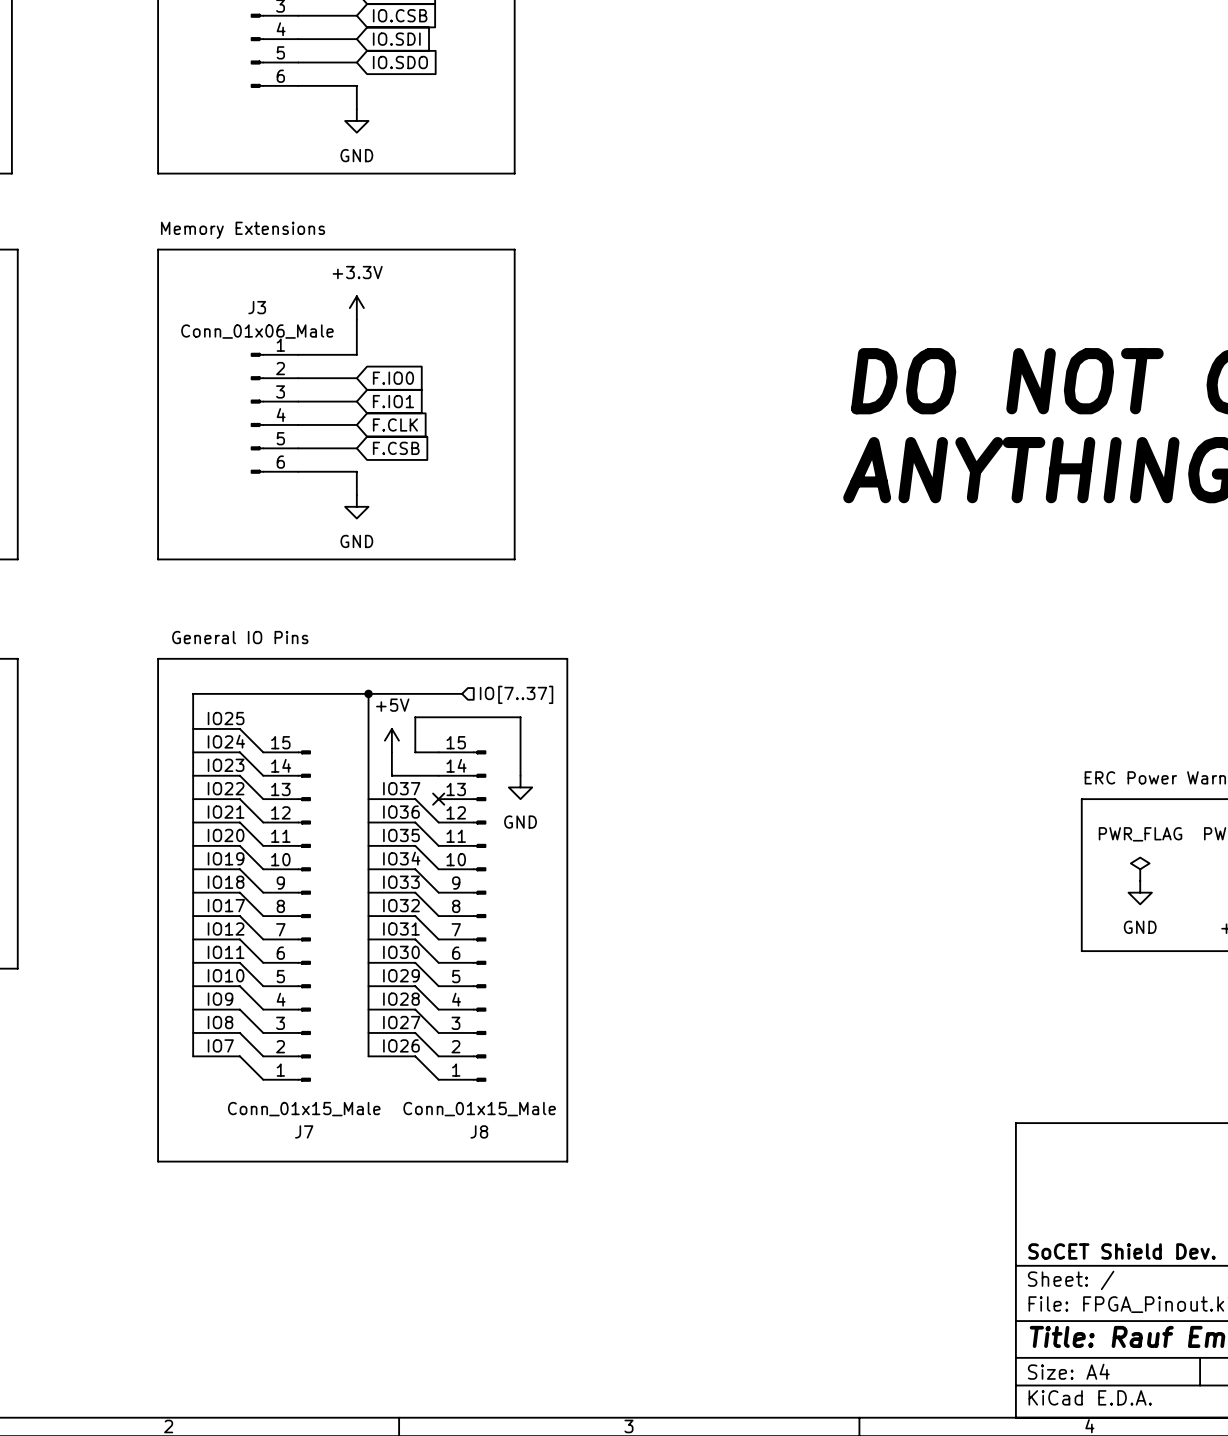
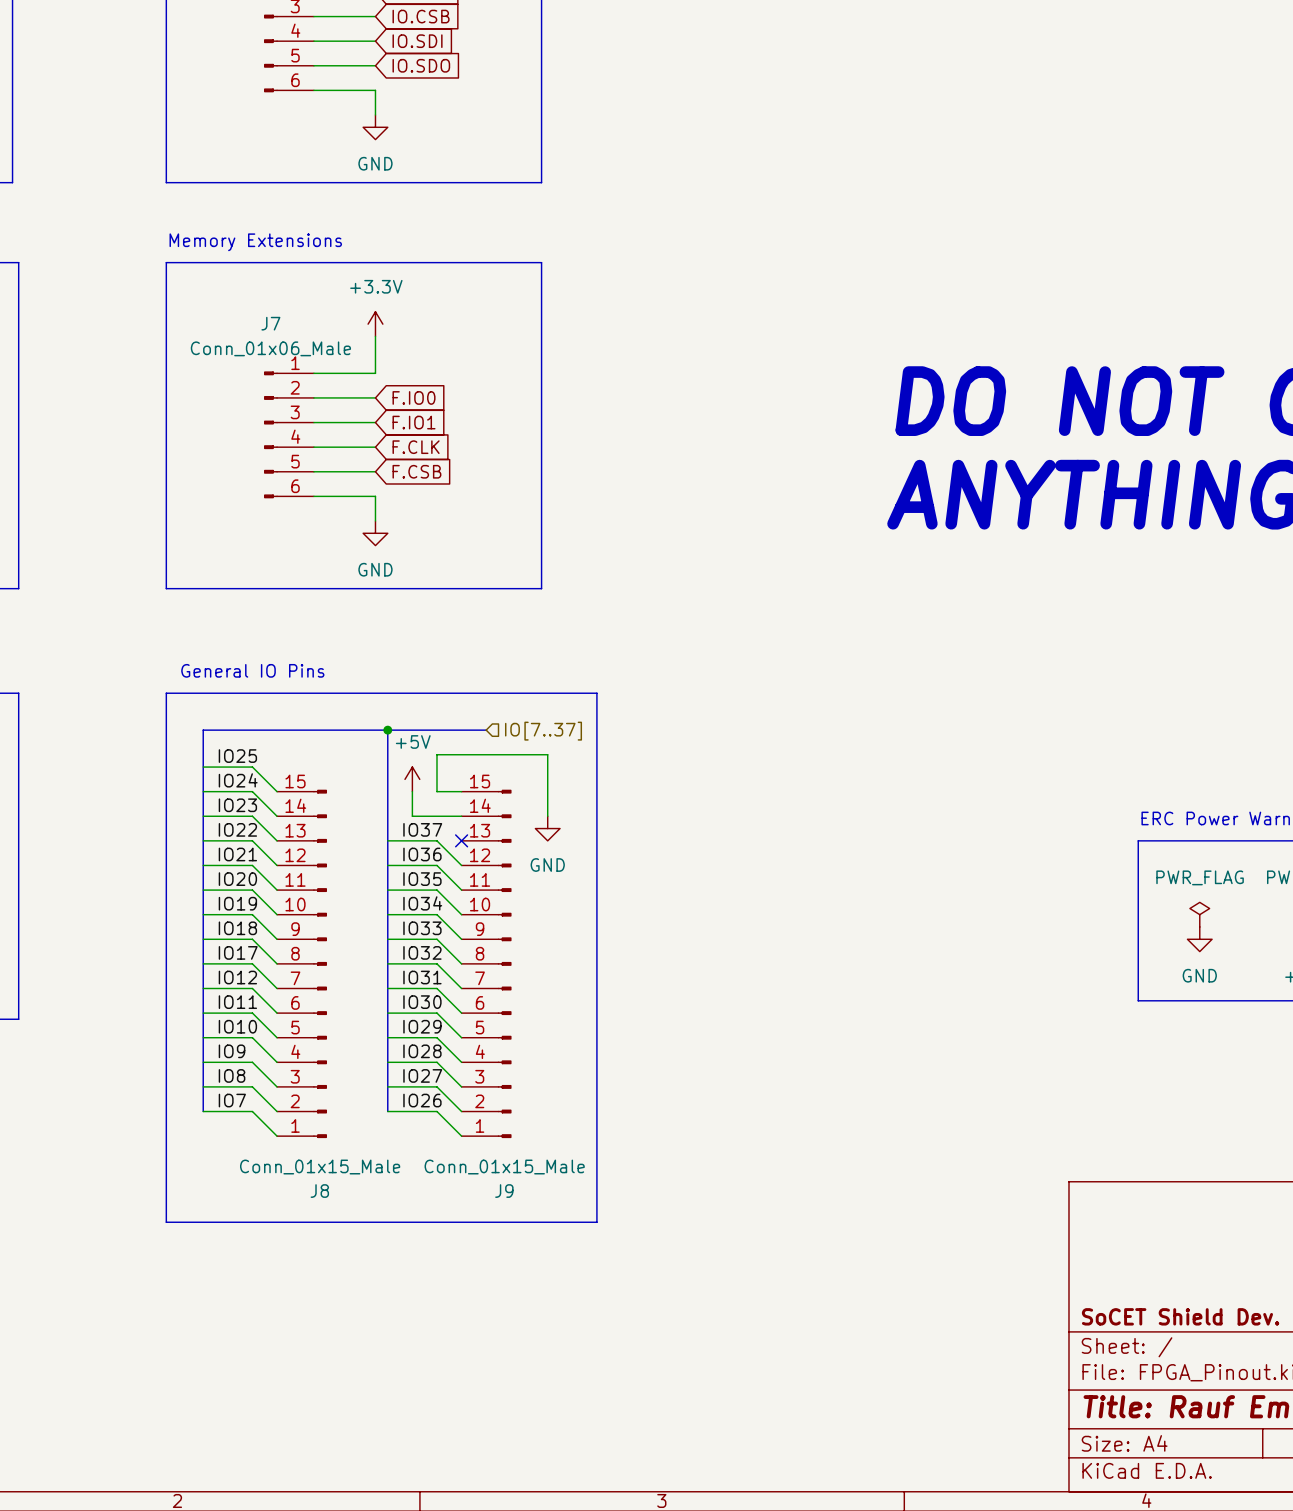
J3 name: J3 (257, 307) -> J7 (270, 323)
J7 name: J7 (304, 1131) -> J8 (319, 1191)
J8 name: J8 (479, 1131) -> J9 (504, 1191)

